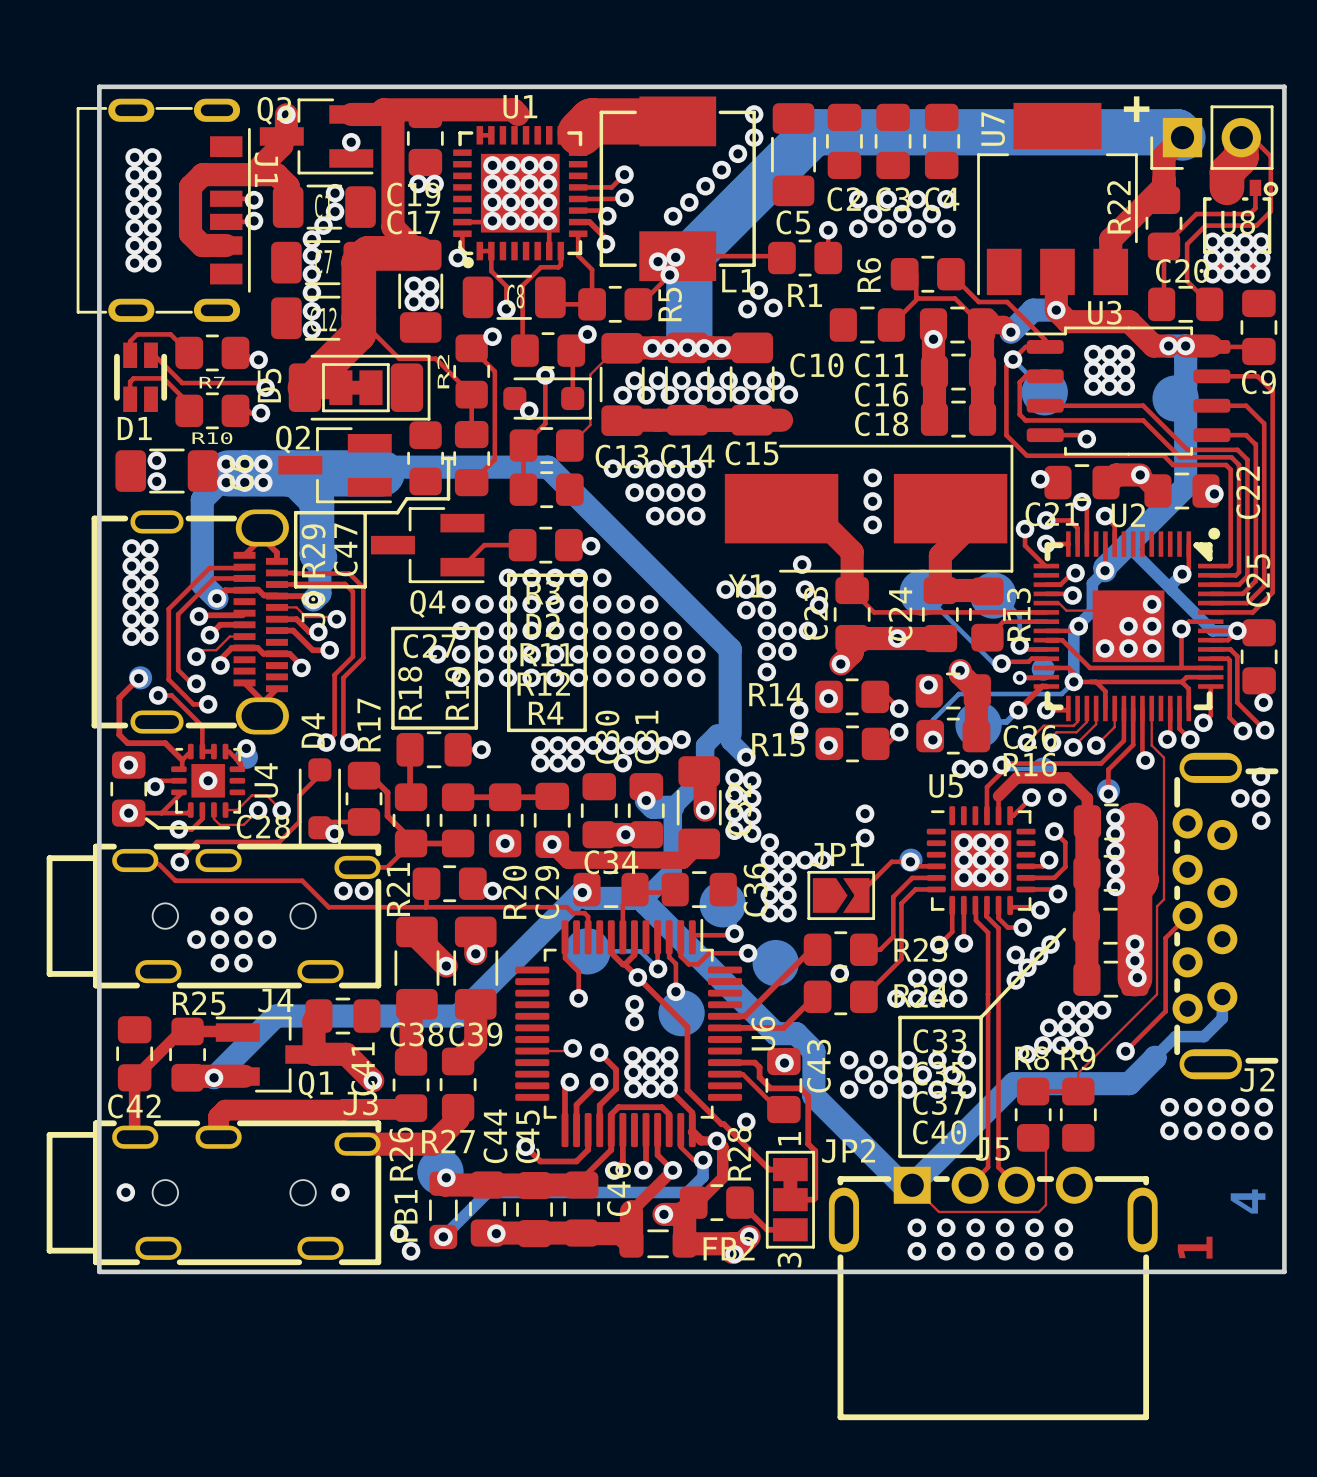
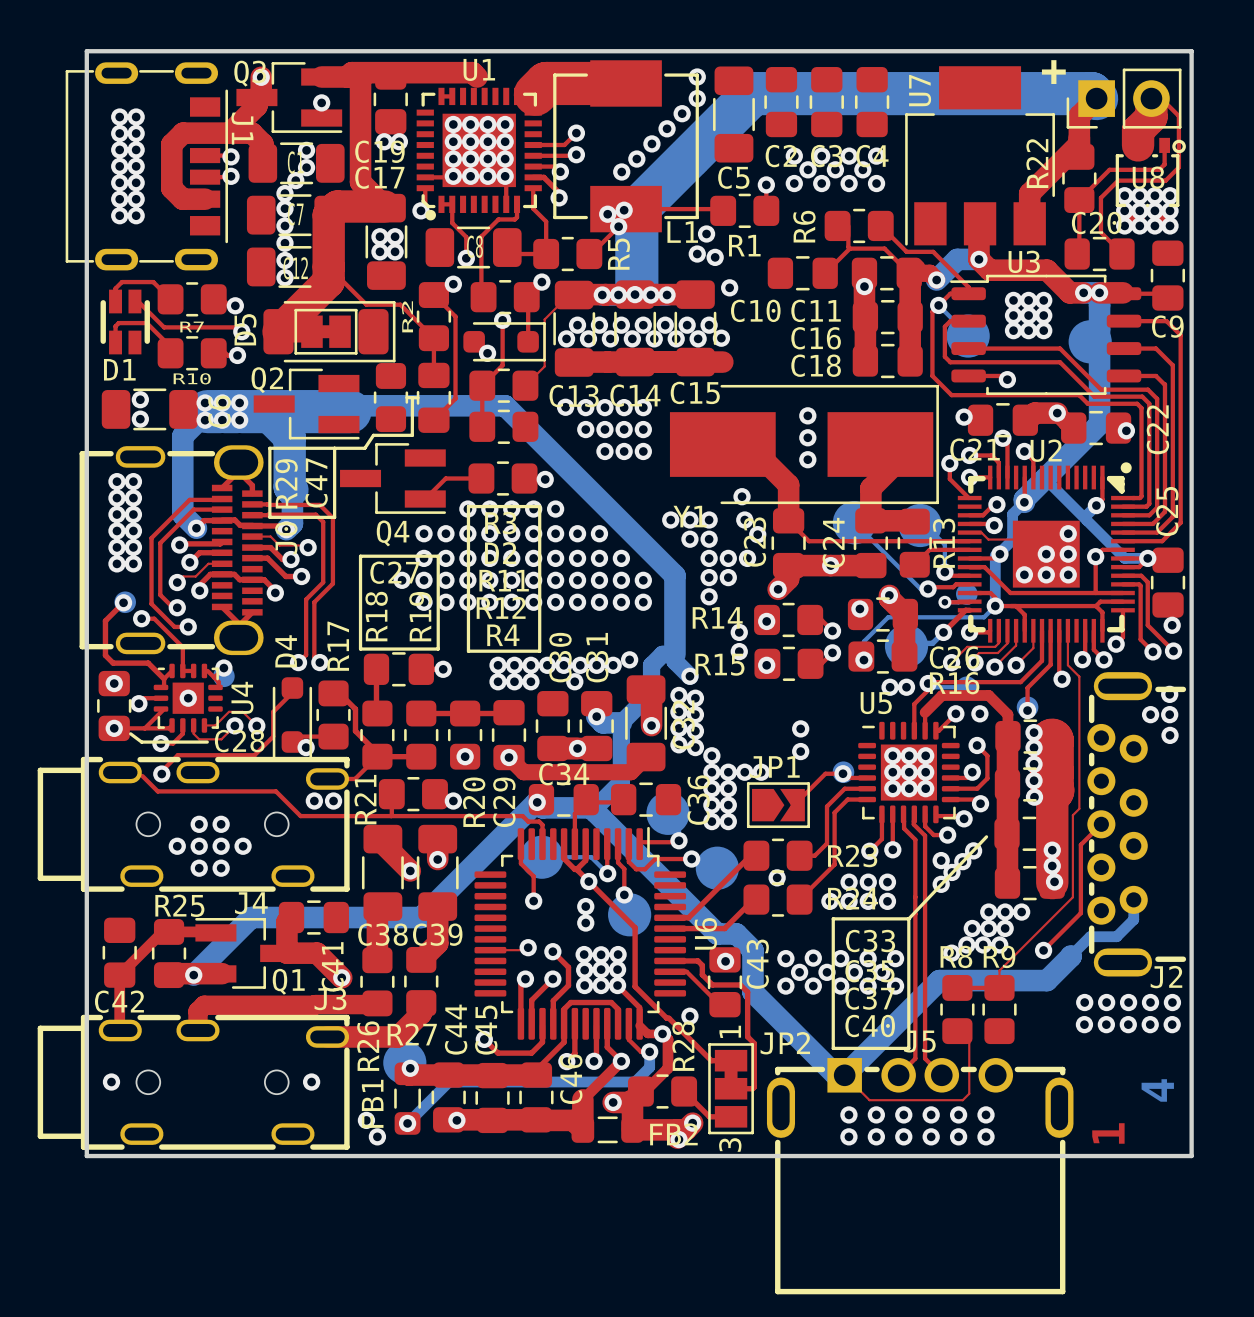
via: none -> (706, 233)
via: (758, 290) -> none
via: none -> (697, 254)
via: (747, 309) -> none
via: none -> (729, 287)
via: none -> (577, 325)
via: (634, 380) -> none
via: none -> (599, 325)
via: (658, 380) -> none
via: none -> (621, 325)
via: (681, 380) -> none
via: none -> (643, 325)
via: (705, 380) -> none
via: none -> (665, 325)
via: (728, 380) -> none
via: none -> (687, 325)
via: (752, 380) -> none
via: none -> (709, 325)
via: (775, 380) -> none
via: none -> (721, 338)
via: (788, 394) -> none
via: none -> (566, 338)
via: (622, 395) -> none
via: none -> (588, 338)
via: (646, 395) -> none
via: none -> (610, 338)
via: (669, 395) -> none
via: none -> (632, 338)
via: (693, 395) -> none
via: none -> (654, 338)
via: (716, 395) -> none
via: none -> (676, 338)
via: (740, 395) -> none
via: none -> (698, 338)
via: (763, 395) -> none

